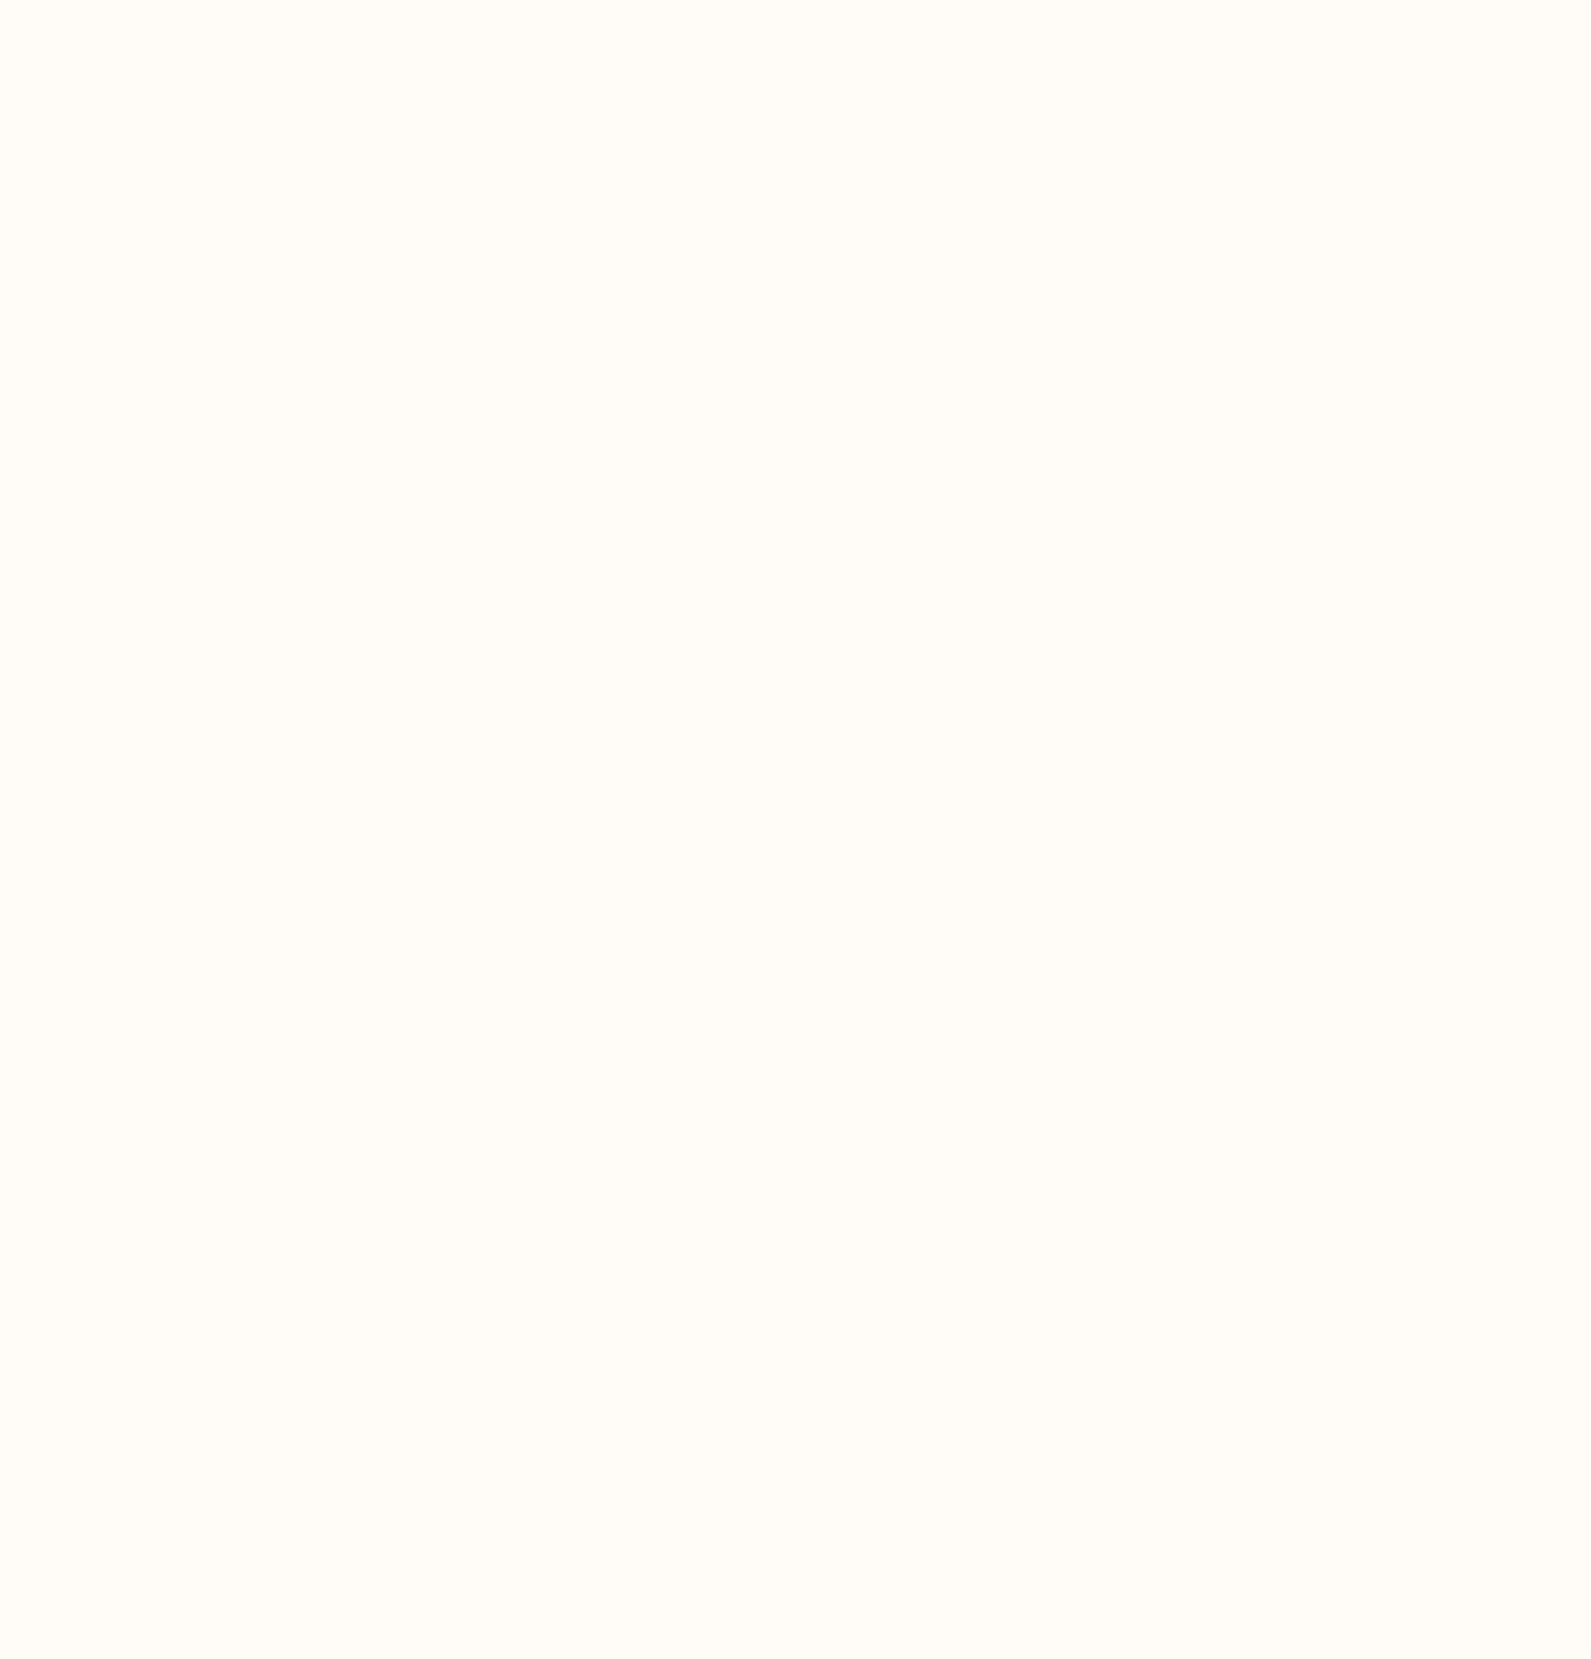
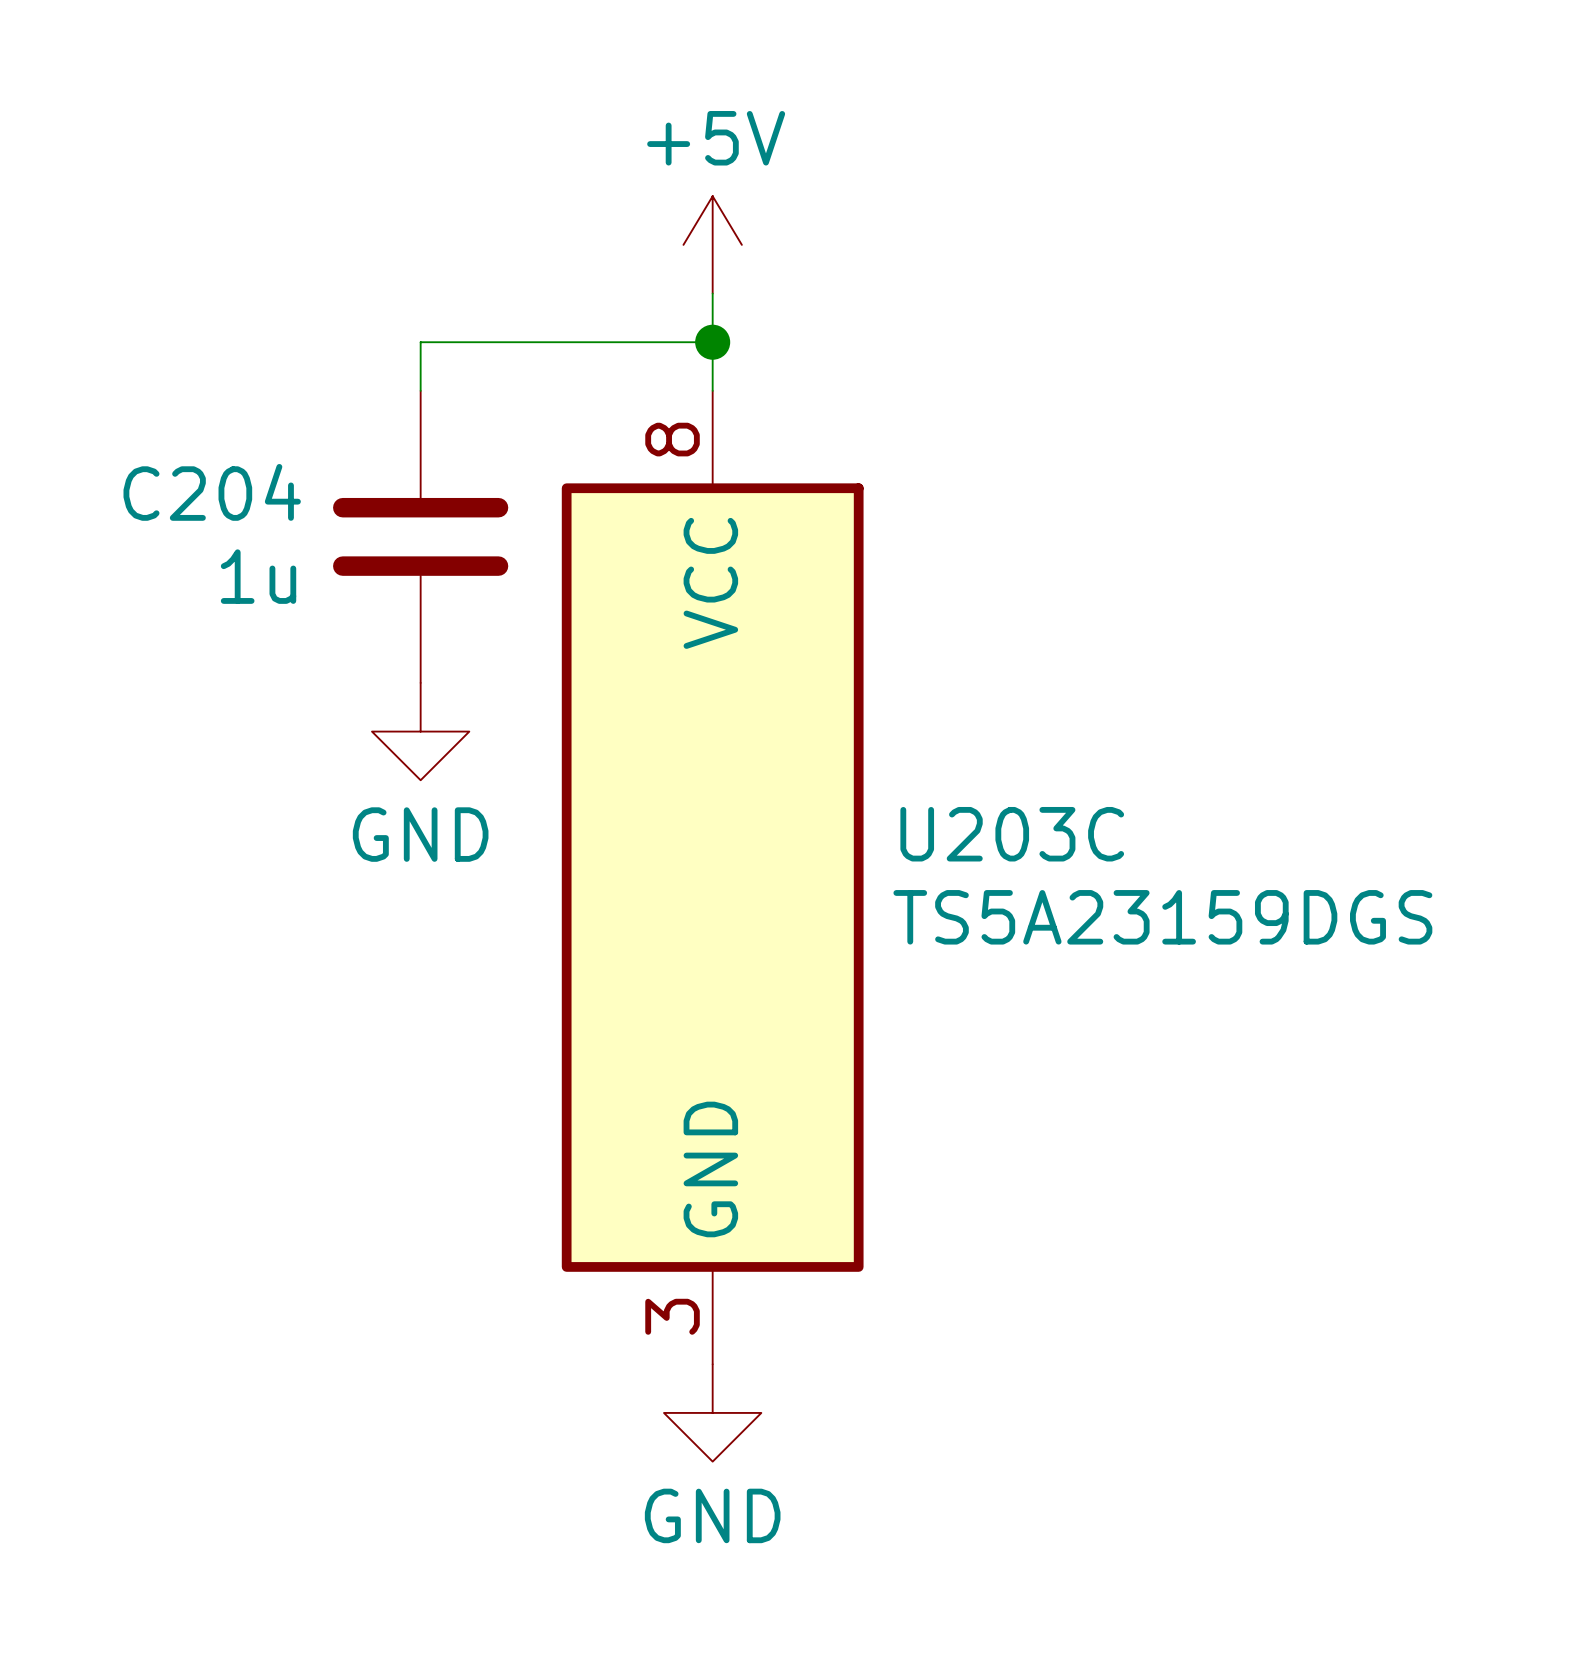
power symbol: none -> +5V (712, 244)
wire: none -> (712, 293) (712, 390)
wire: none -> (712, 342) (420, 342) (420, 390)
junction: none -> (712, 342)
C204: none -> 1u (420, 536)
power symbol: none -> GND (420, 731)
U203C: none -> TS5A23159DGS (712, 877)
power symbol: none -> GND (712, 1412)

